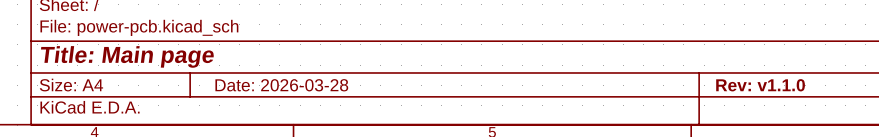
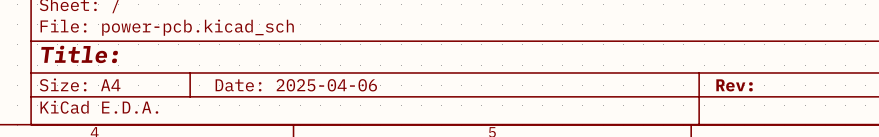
title block: Title: Main page (127, 56) -> Title: (79, 54)
title block: Date: 2026-03-28 (281, 85) -> Date: 2025-04-06 (296, 85)
title block: Rev: v1.1.0 (760, 85) -> Rev: (734, 85)

